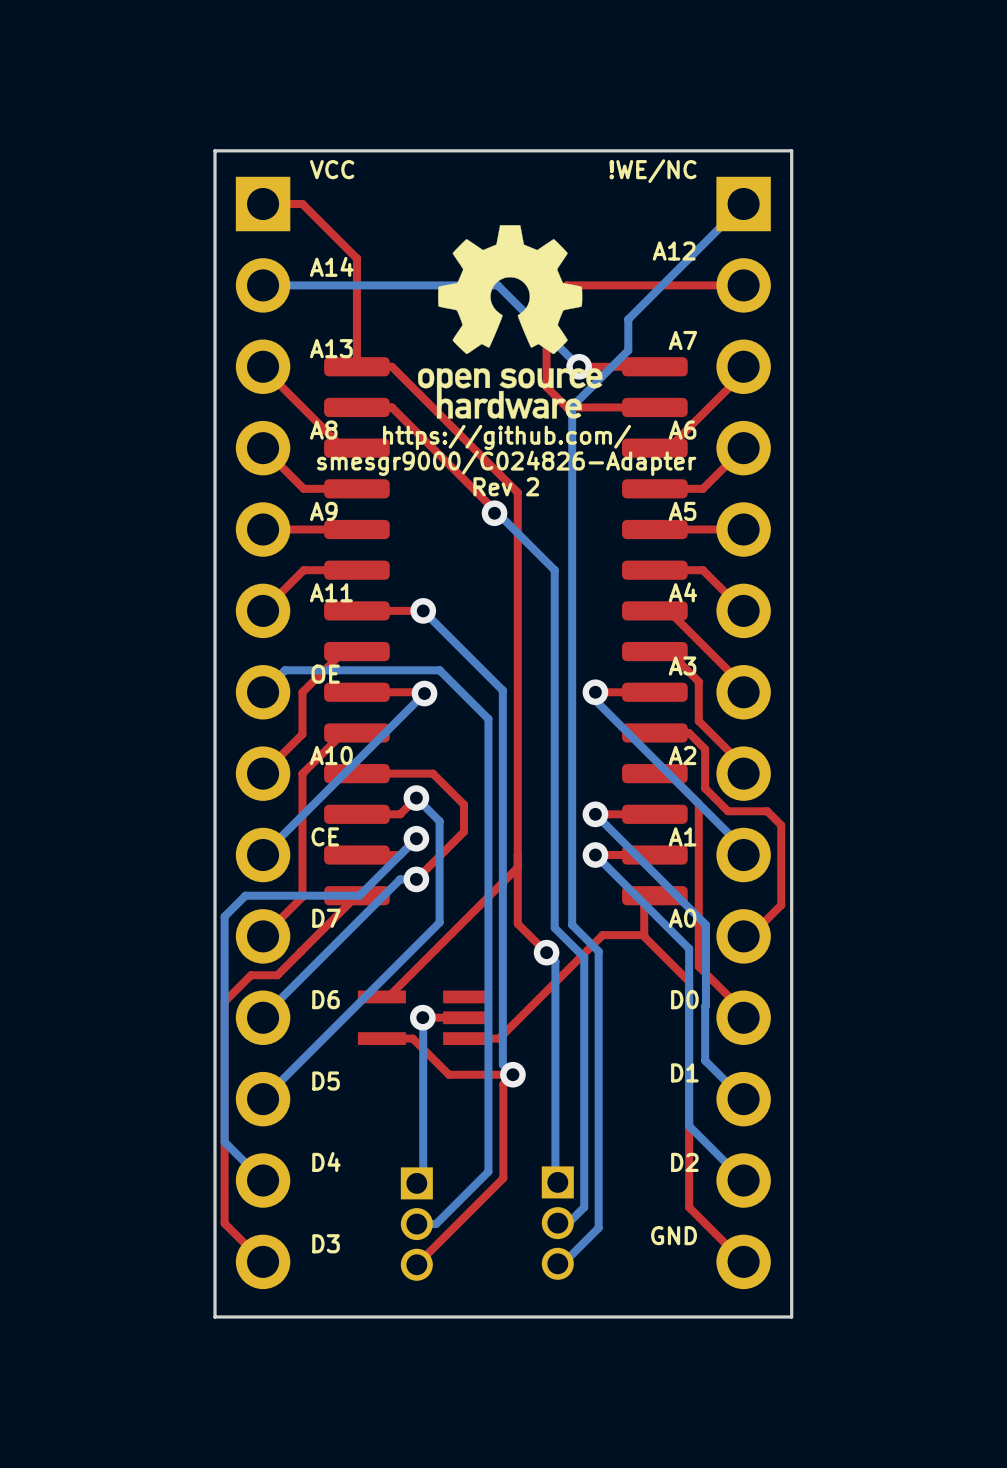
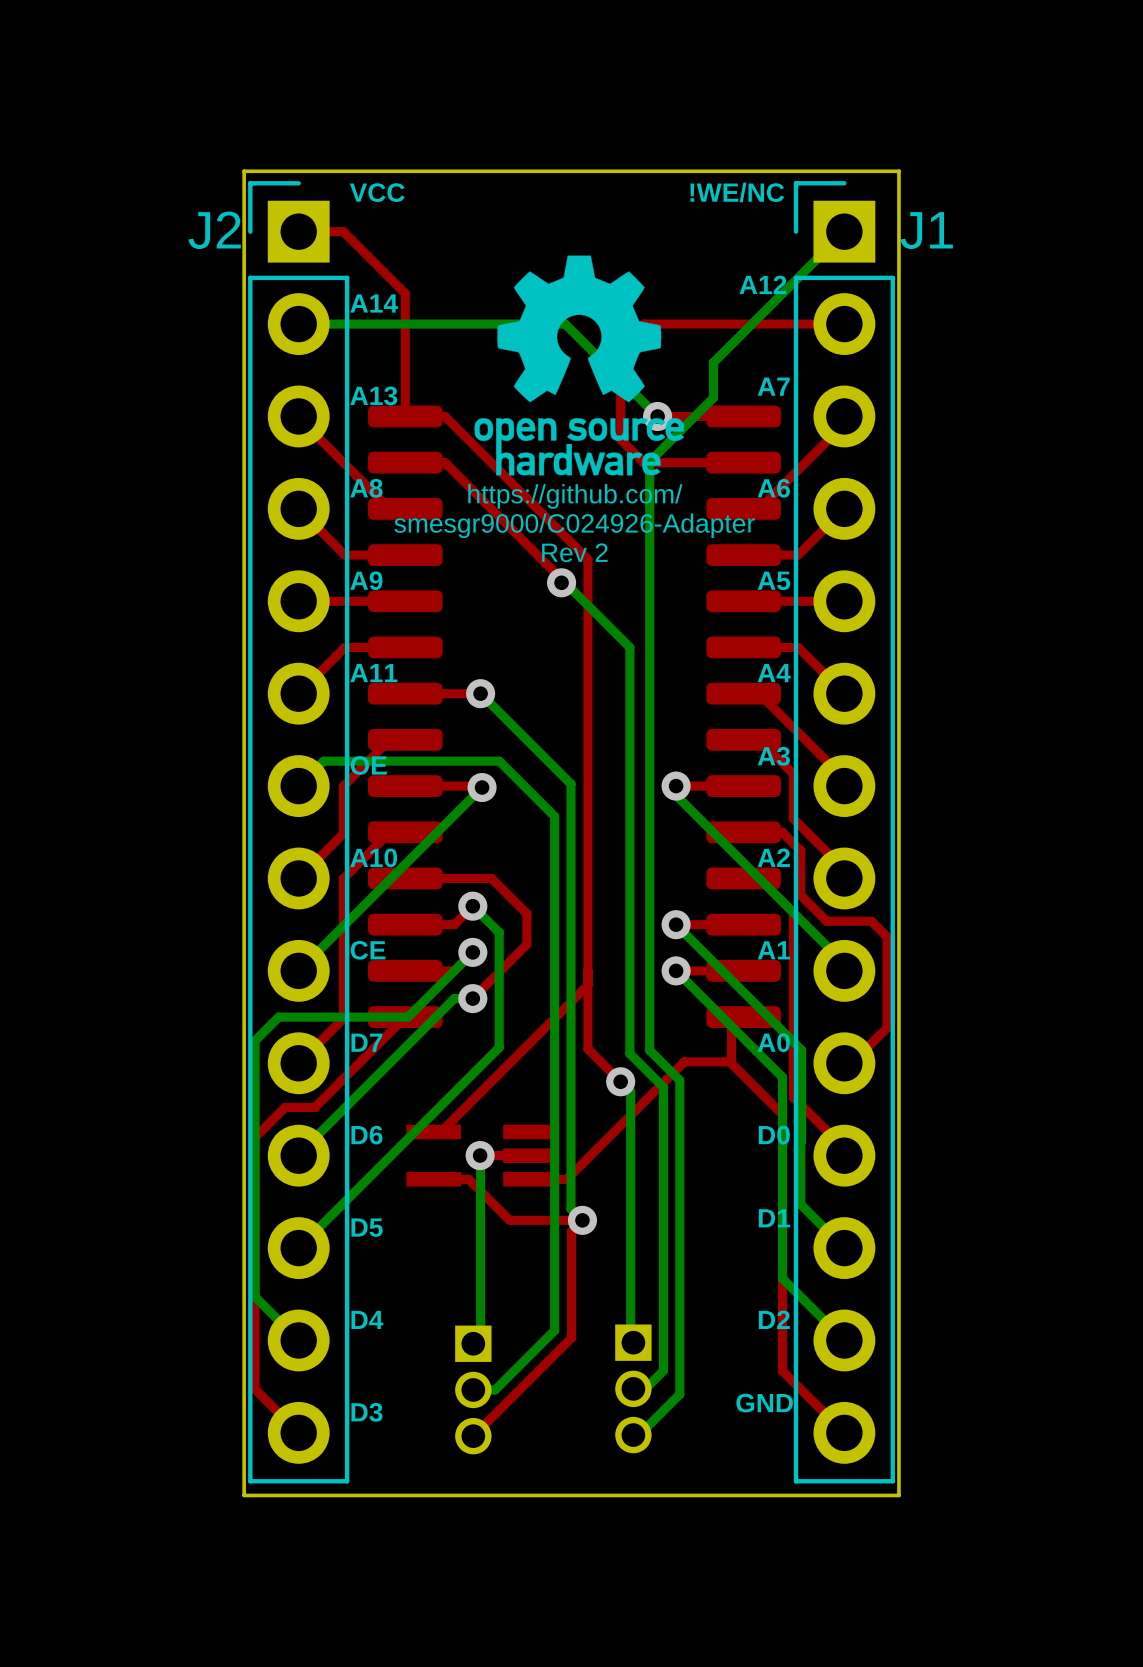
text: smesgr9000/C024826-Adapter (506, 463) -> smesgr9000/C024926-Adapter (574, 525)
J2 side: top (263, 732) -> bottom (298, 832)
J1 side: top (743, 732) -> bottom (844, 832)

